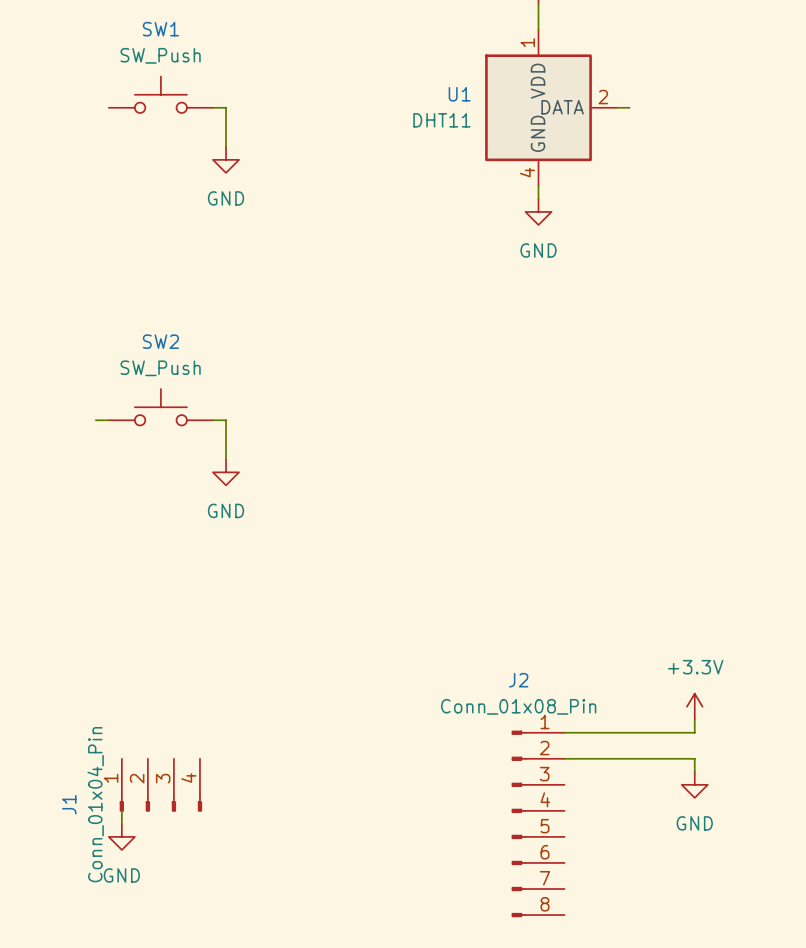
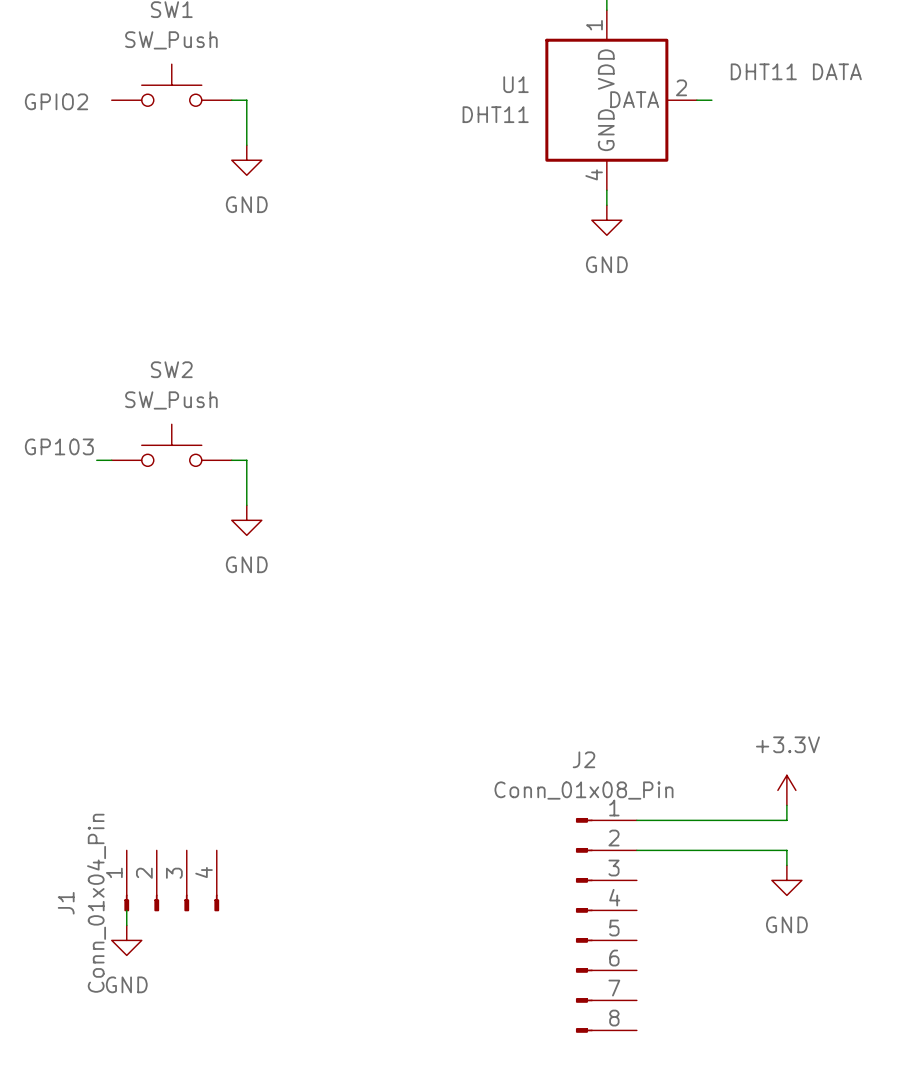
label: none -> DHT11 DATA (796, 71)
label: none -> GPIO2 (56, 101)
label: none -> GP103 (59, 446)

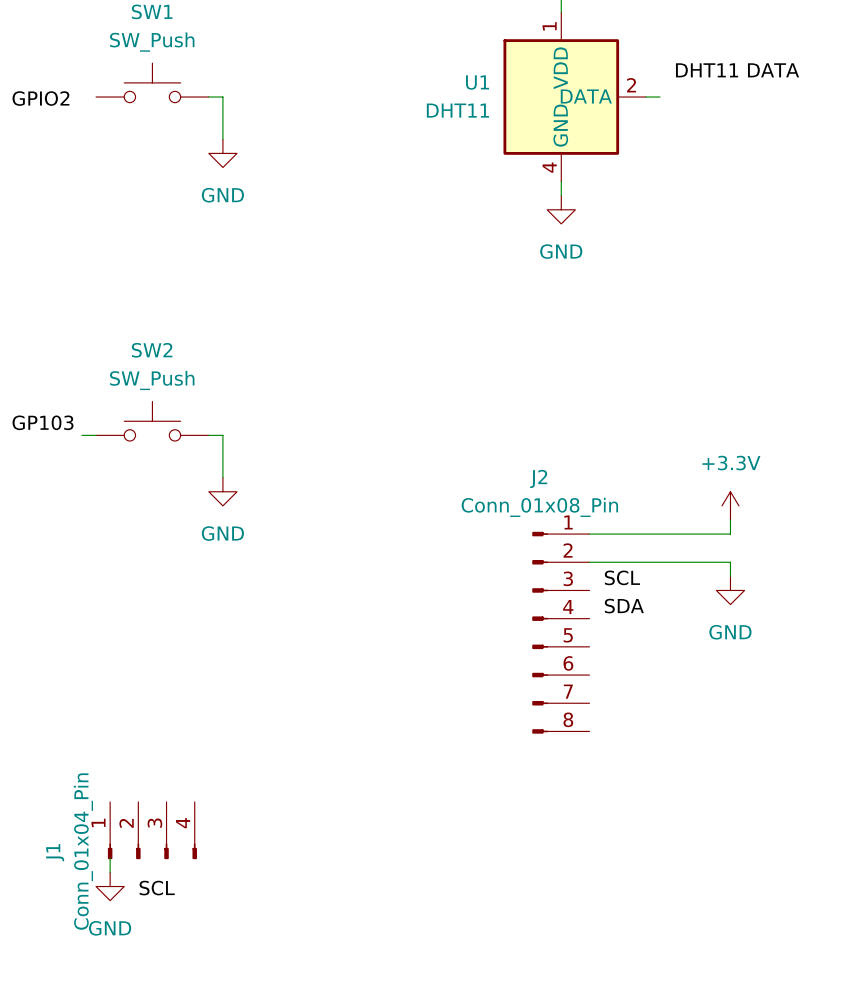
label: none -> SCL (622, 577)
label: none -> SDA (624, 606)
power symbol position: +3.3V (786, 790) -> +3.3V (730, 505)
wire: (786, 805) (786, 820) (636, 820) -> (730, 519) (730, 534) (589, 534)
wire: (636, 850) (786, 850) (786, 865) -> (589, 562) (730, 562) (730, 576)
power symbol position: GND (786, 880) -> GND (730, 590)
J2 position: (606, 925) -> (560, 632)
label: none -> SCL (157, 888)

